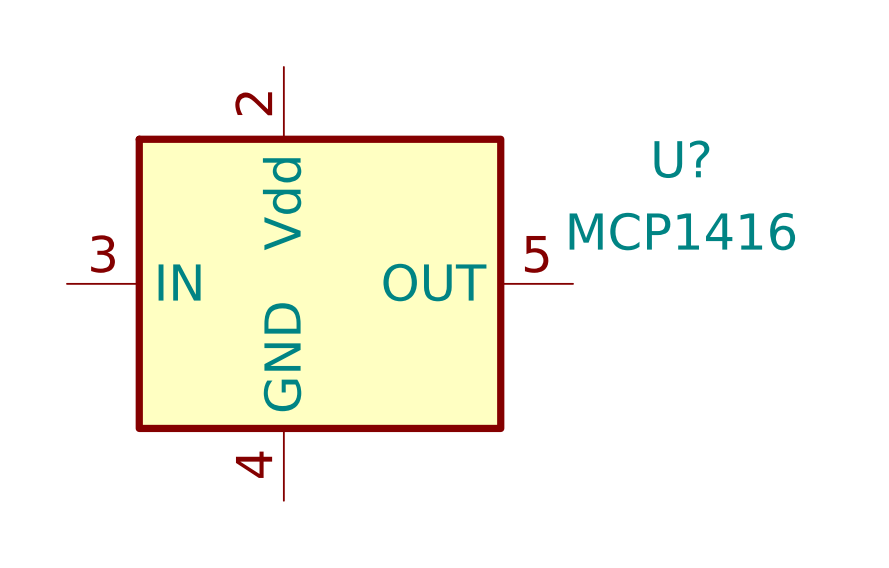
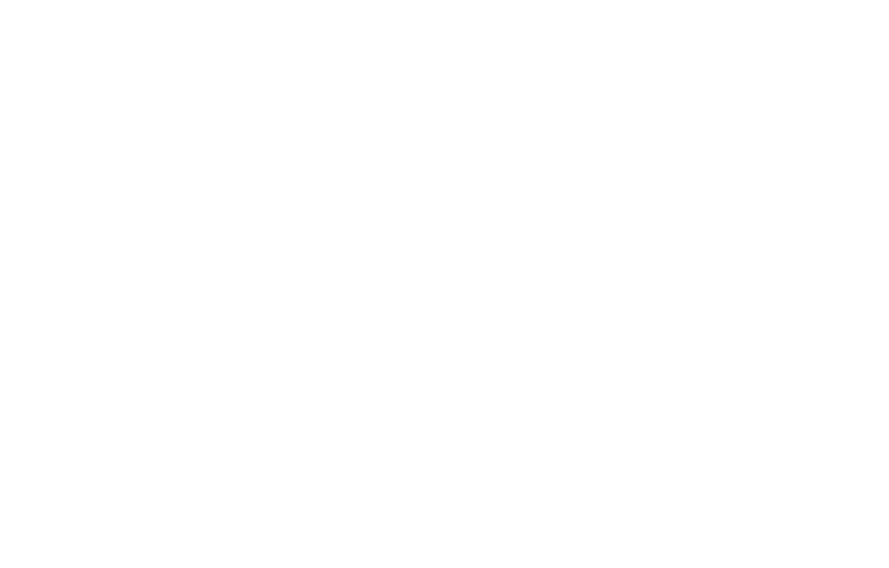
U?: MCP1416 (320, 283) -> none

